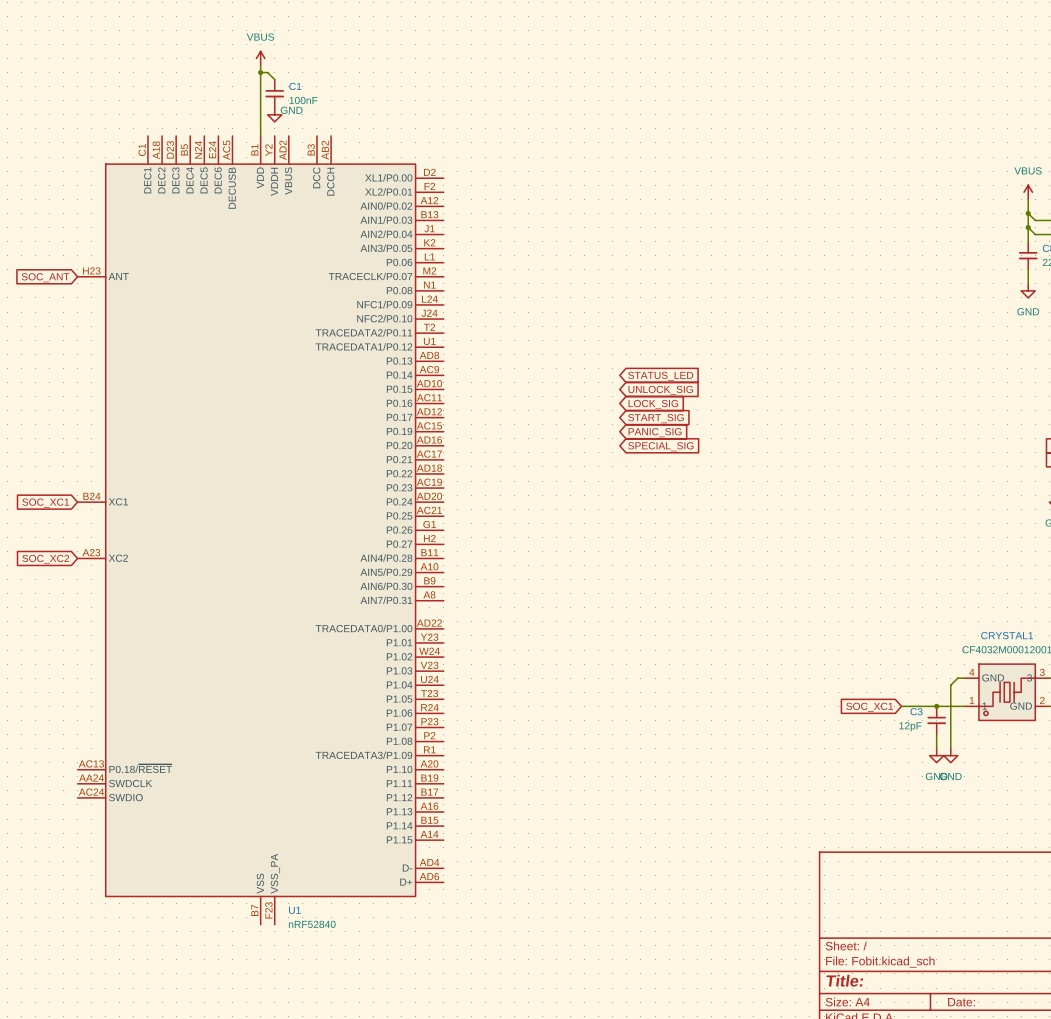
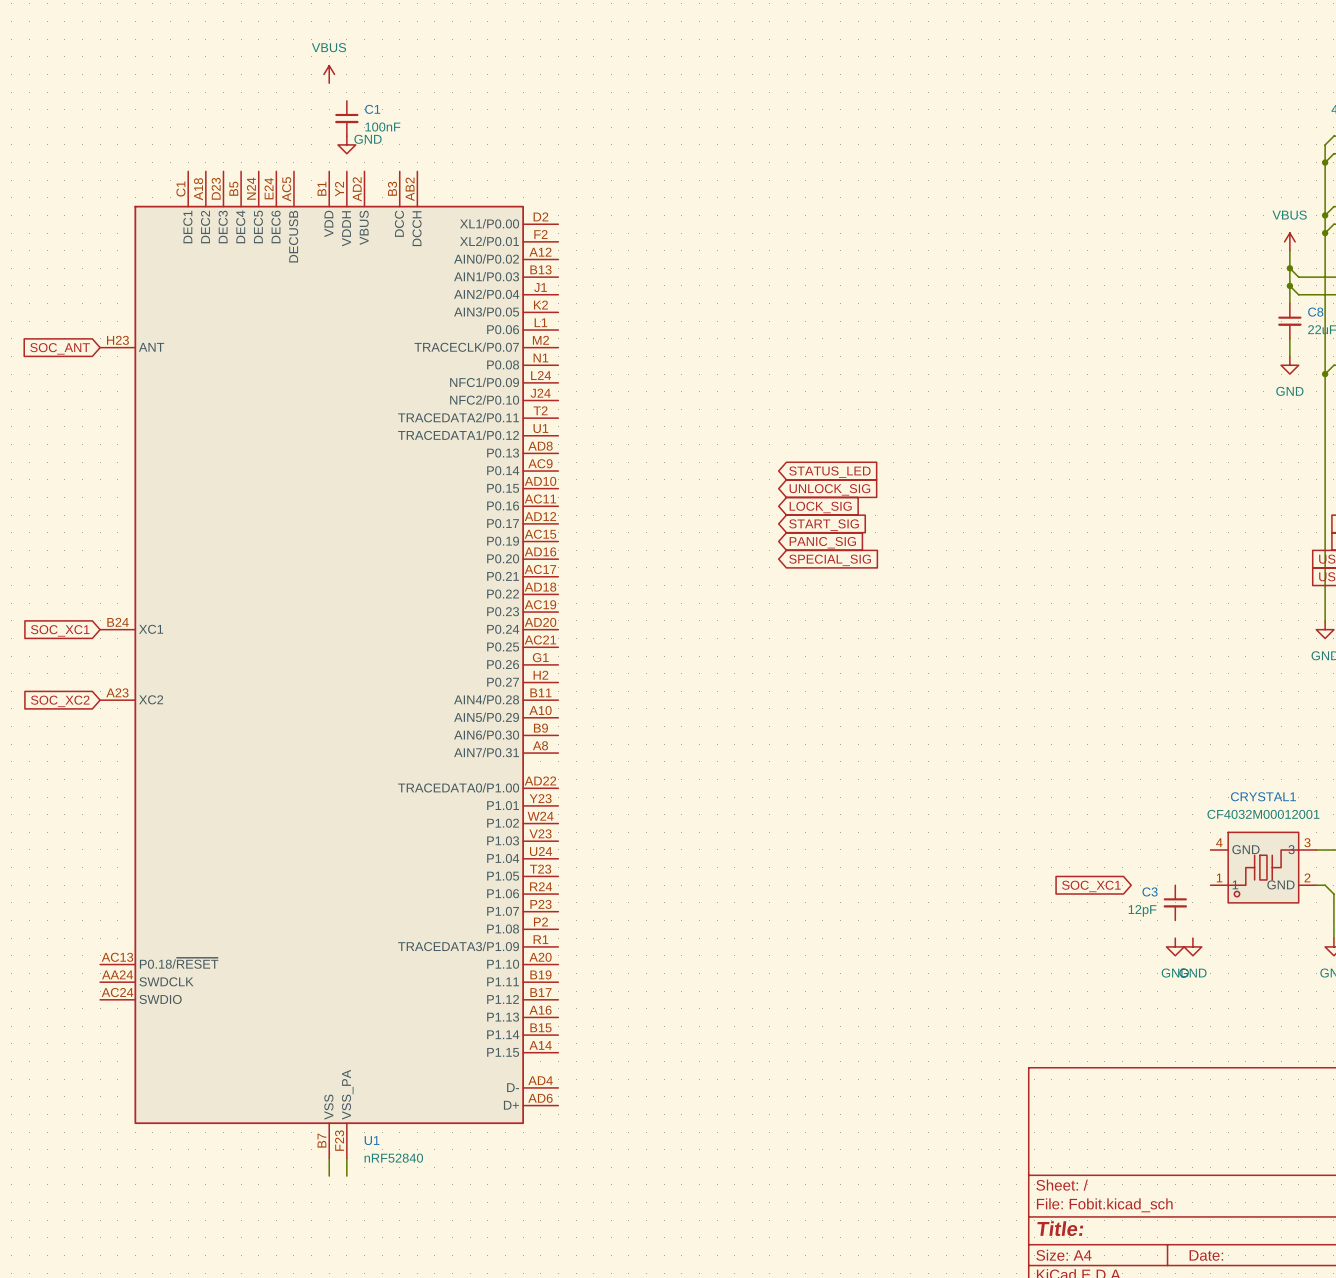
wire: (260, 65) (260, 135) -> none
wire: (260, 72) (267, 72) (274, 79) -> none
junction: (260, 72) -> none
wire: (964, 678) (957, 678) (950, 685) (950, 748) -> none
wire: (901, 706) (964, 706) -> none
junction: (936, 706) -> none
wire: (936, 734) (936, 748) -> none
wire: none -> (329, 1158) (329, 1176)
wire: none -> (346, 1158) (346, 1176)

